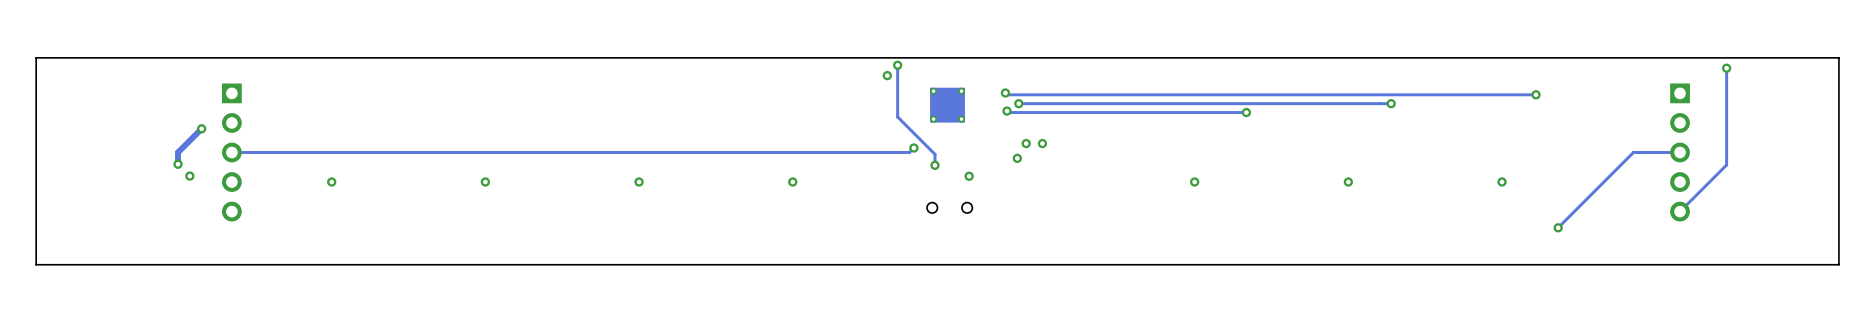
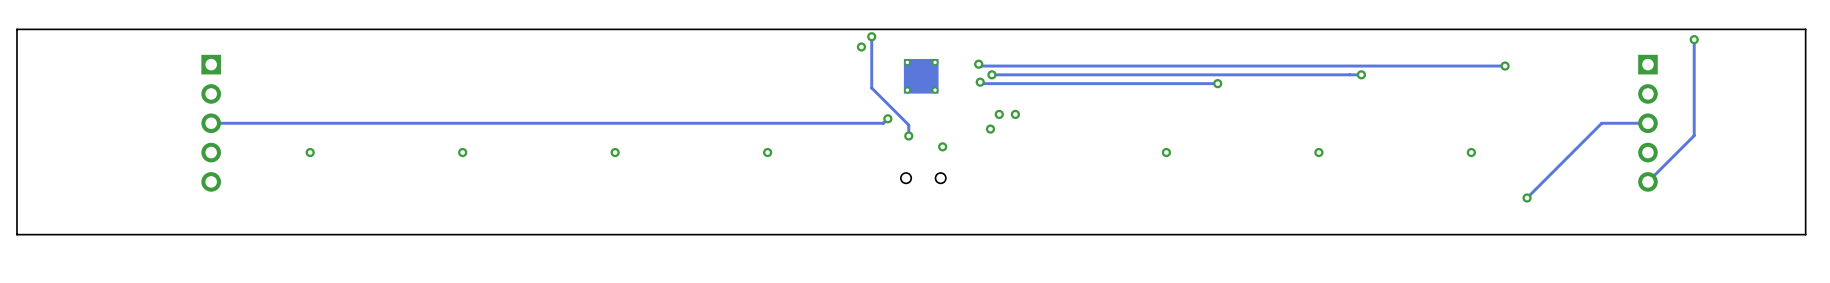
track: (201, 128) (178, 152) (178, 164) -> none
via: (201, 128) -> none
via: (178, 164) -> none
via: (189, 176) -> none

